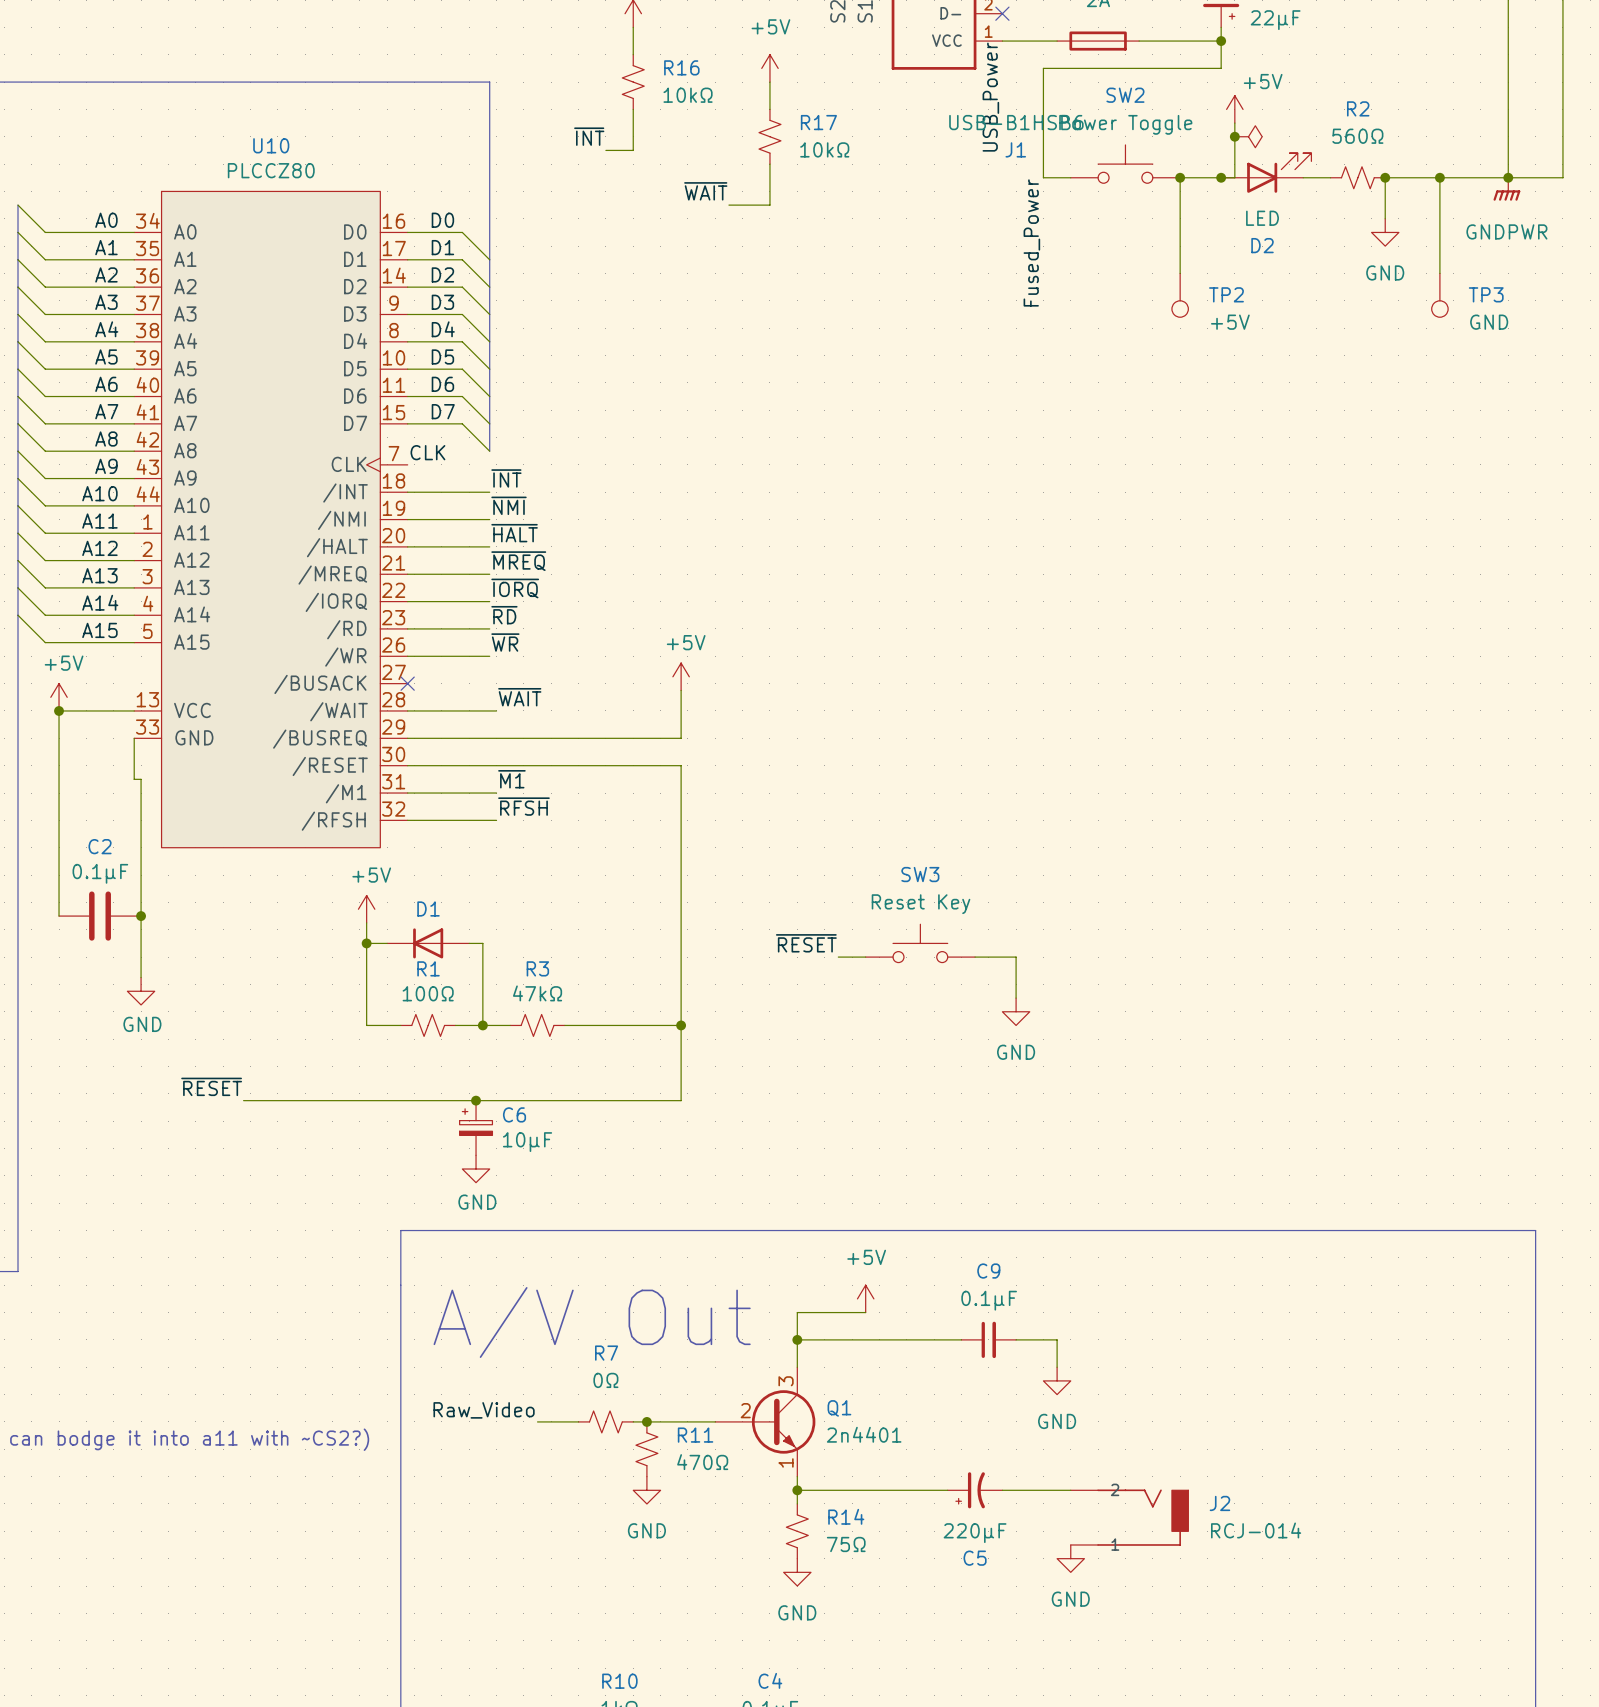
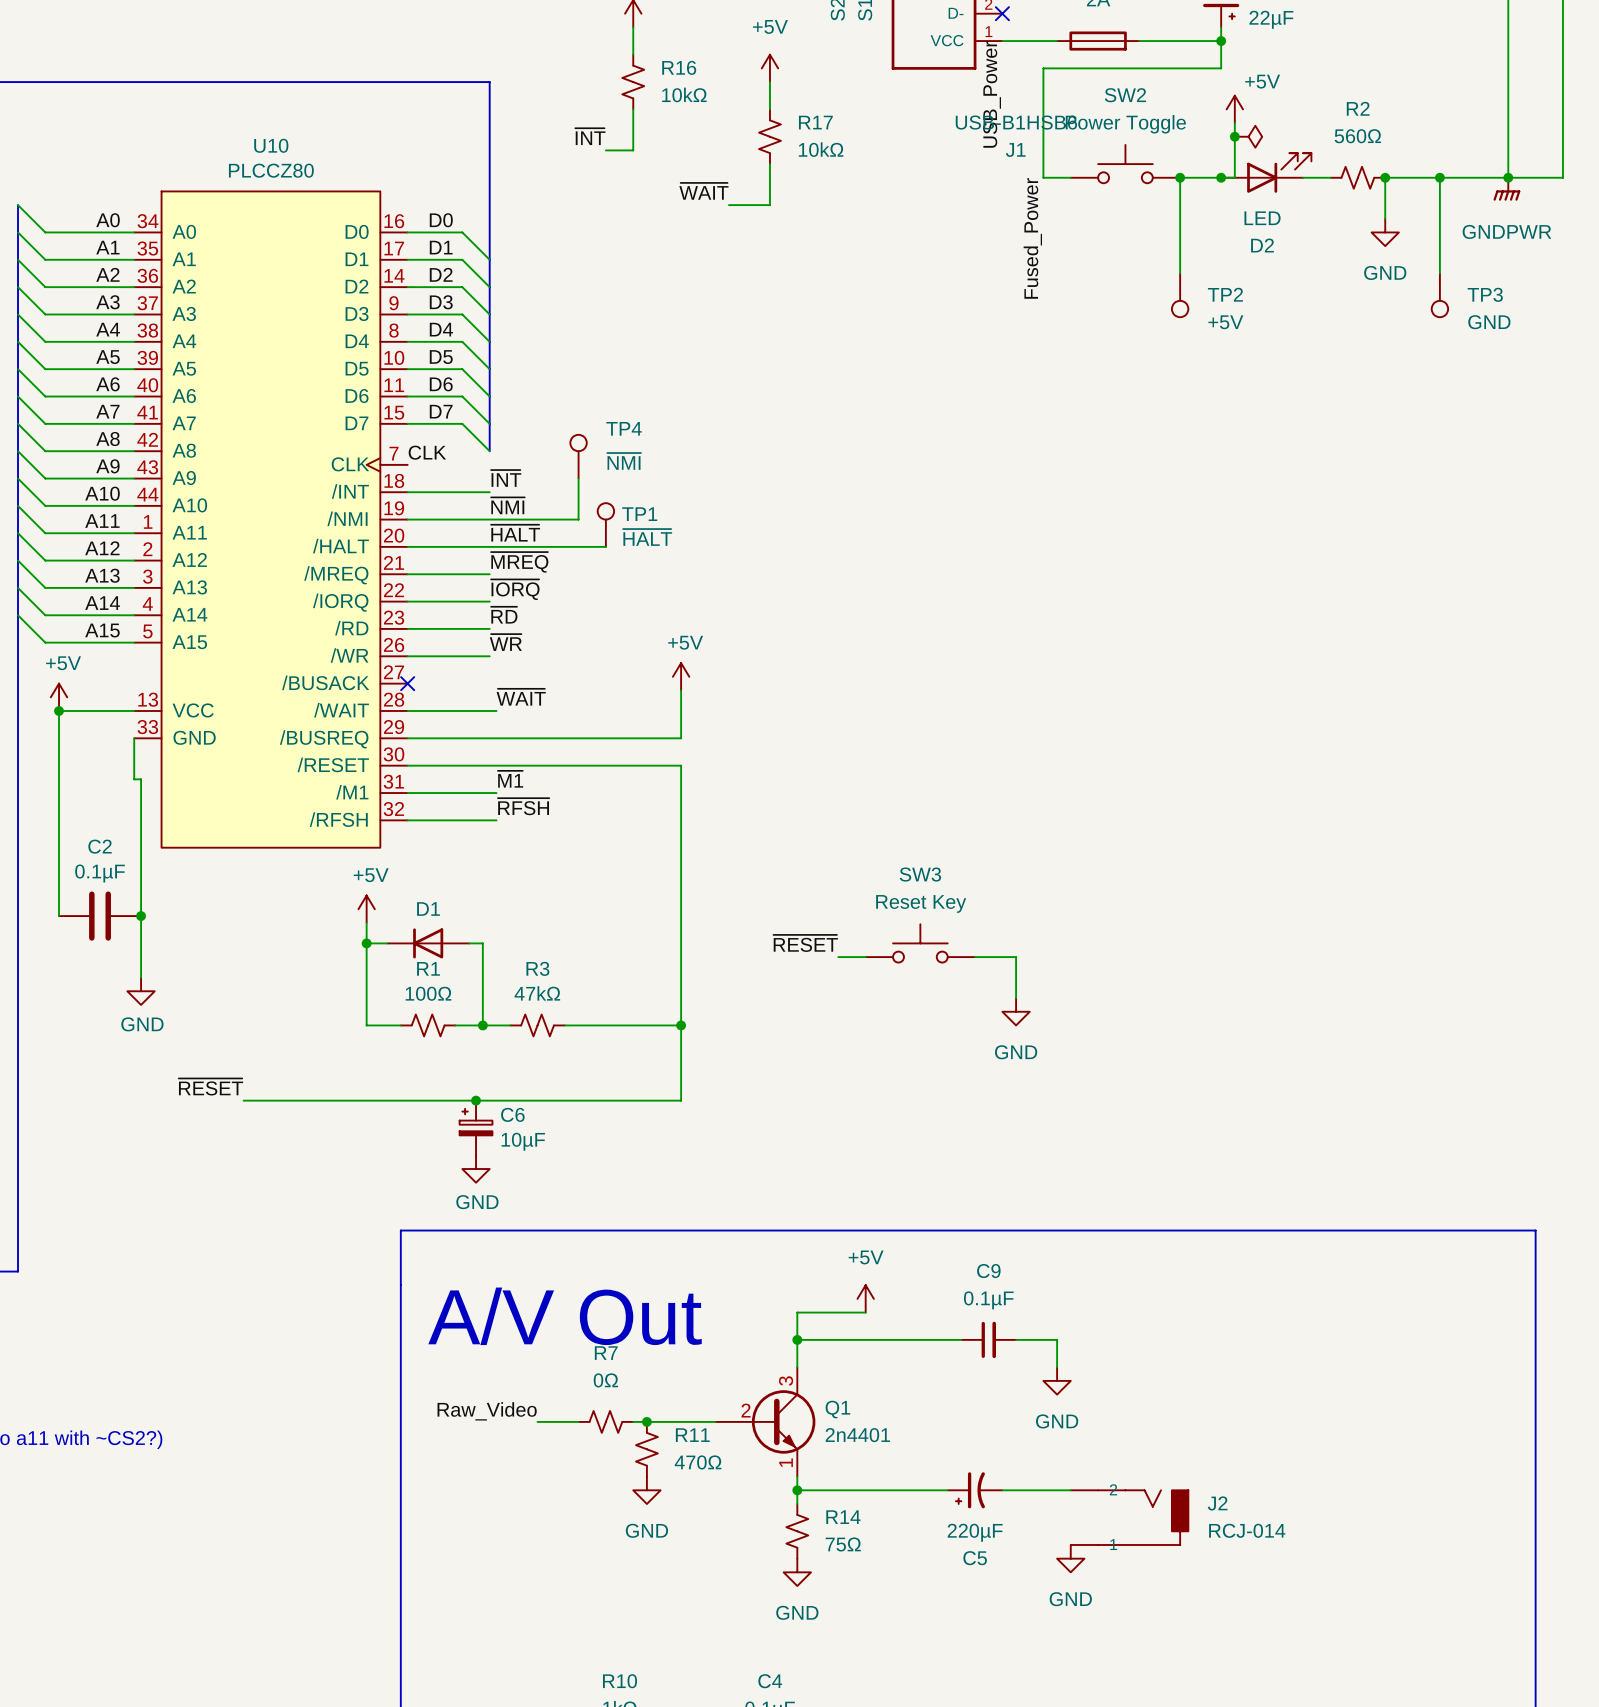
TP4: none -> ~{NMI} (578, 456)
wire: none -> (578, 478) (578, 519) (489, 519)
TP1: none -> ~{HALT} (605, 525)
wire: none -> (489, 546) (605, 546)

